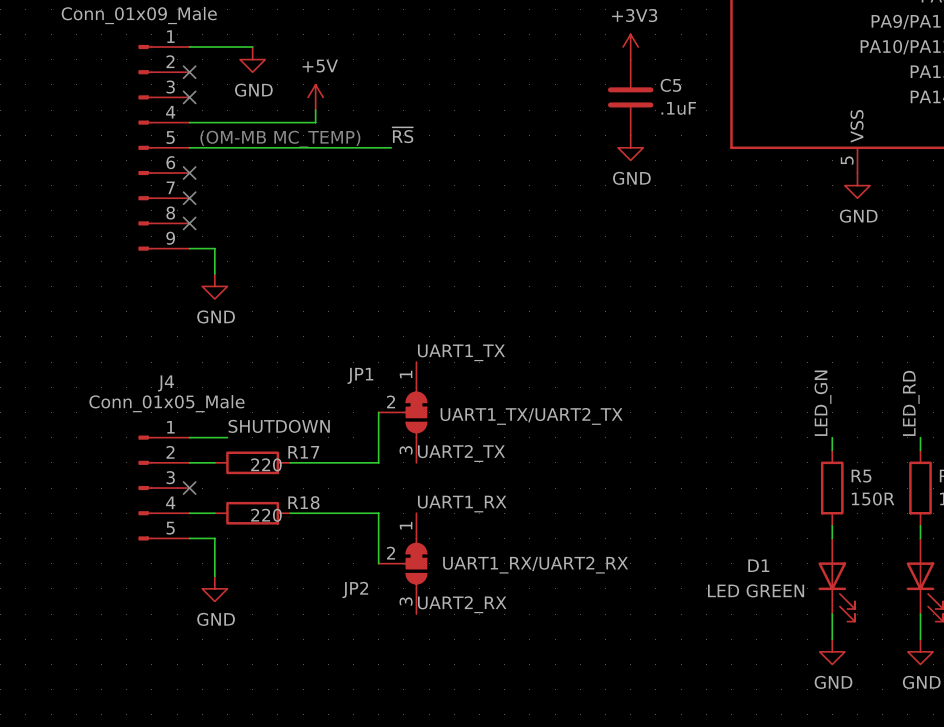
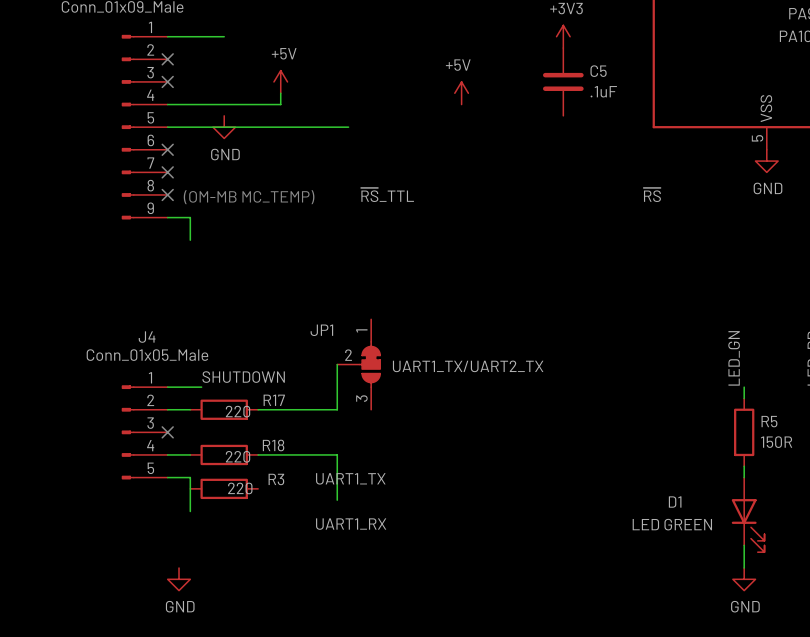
power symbol: GND (252, 59) -> none
power symbol: none -> +5V (461, 93)
label: ~{RS} (402, 135) -> none
text position: (OM-MB MC_TEMP) (280, 139) -> (OM-MB MC_TEMP) (249, 197)
power symbol: none -> GND (224, 127)
power symbol: GND (630, 147) -> none
label: none -> ~{RS} (652, 194)
label: none -> ~{RS}_TTL (387, 194)
power symbol: GND (214, 286) -> none
label position: UART1_TX (461, 352) -> UART1_TX (350, 478)
label: UART2_TX (461, 453) -> none
label position: UART1_RX (462, 504) -> UART1_RX (351, 524)
R3: none -> 220 (224, 488)
JP2: UART1_RX/UART2_RX (402, 563) -> none
power symbol position: GND (214, 588) -> GND (179, 579)
label: UART2_RX (462, 604) -> none

